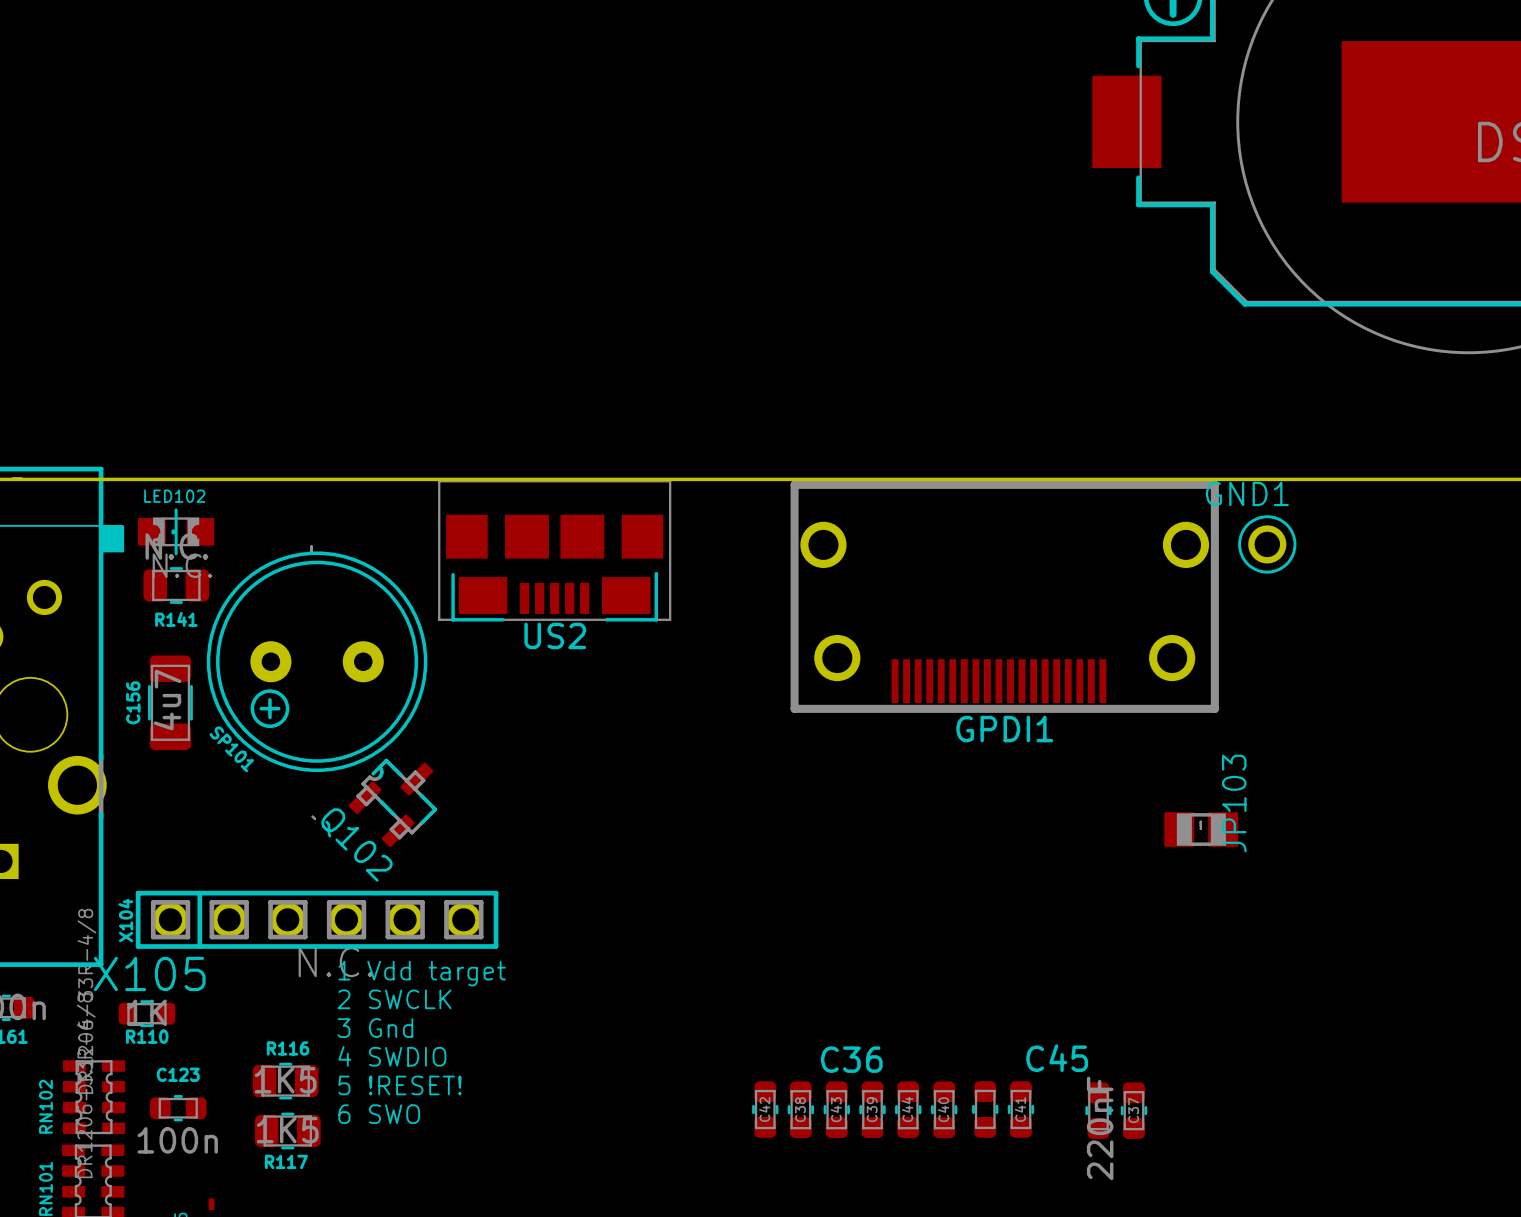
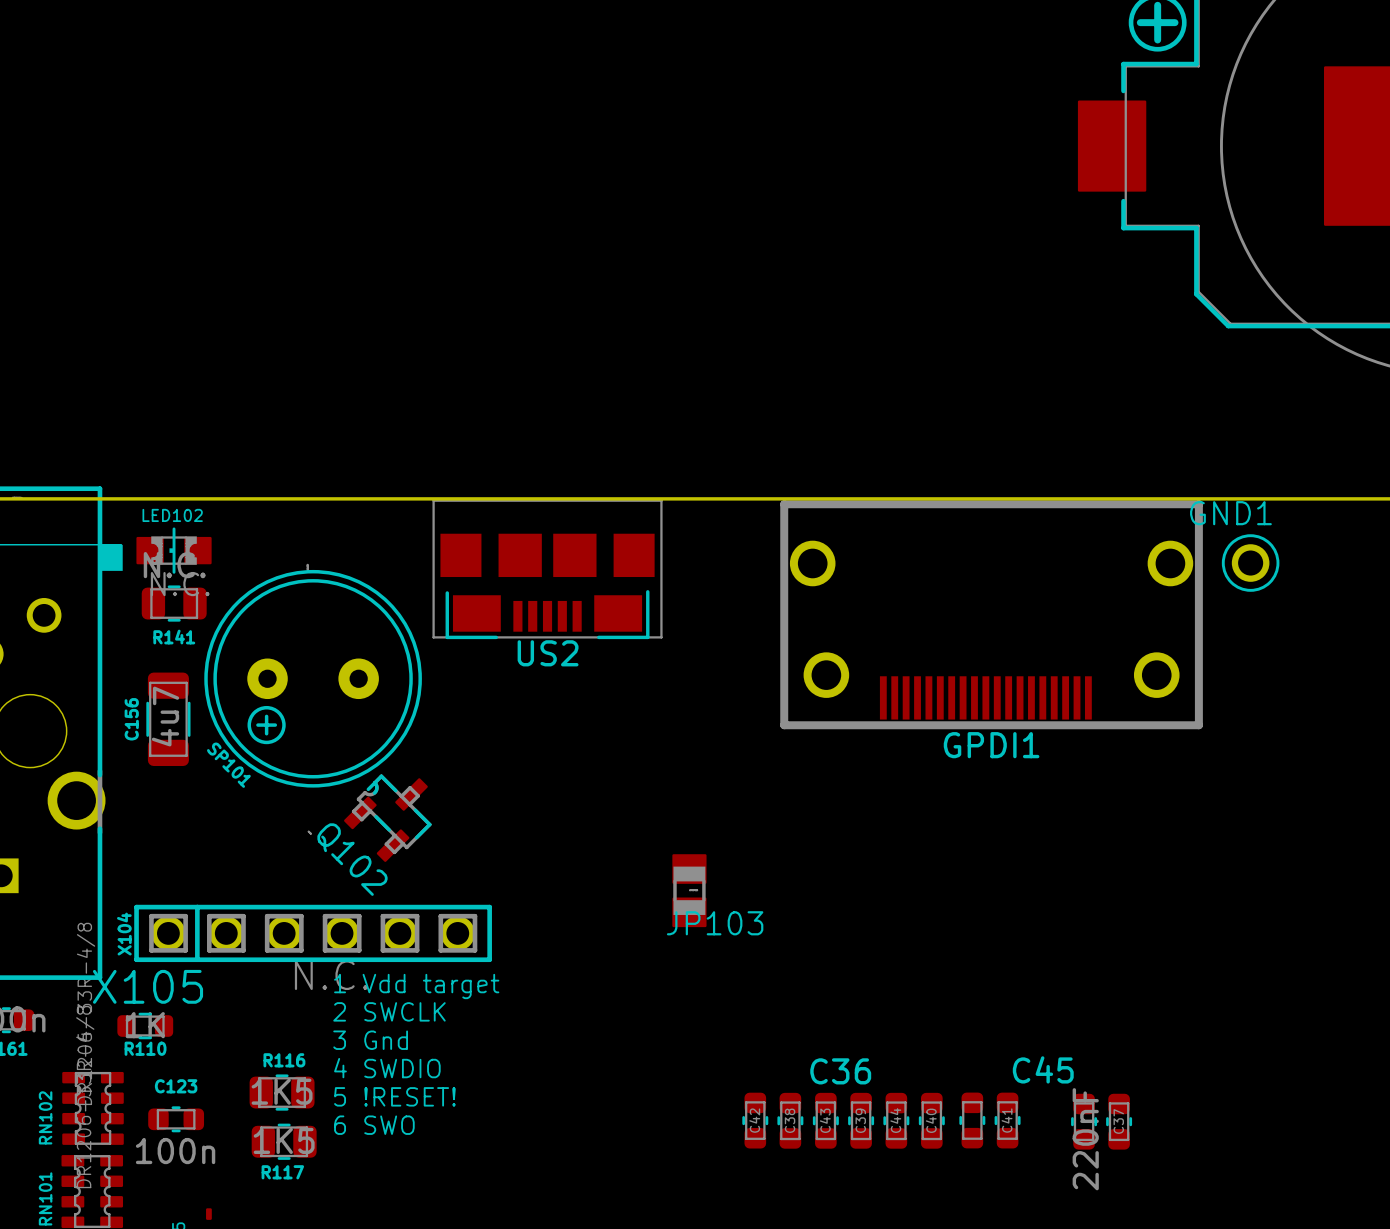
JP103 rotation: 0° (1201, 829) -> 90° clockwise (689, 890)
JP103 position: (1201, 829) -> (689, 890)

